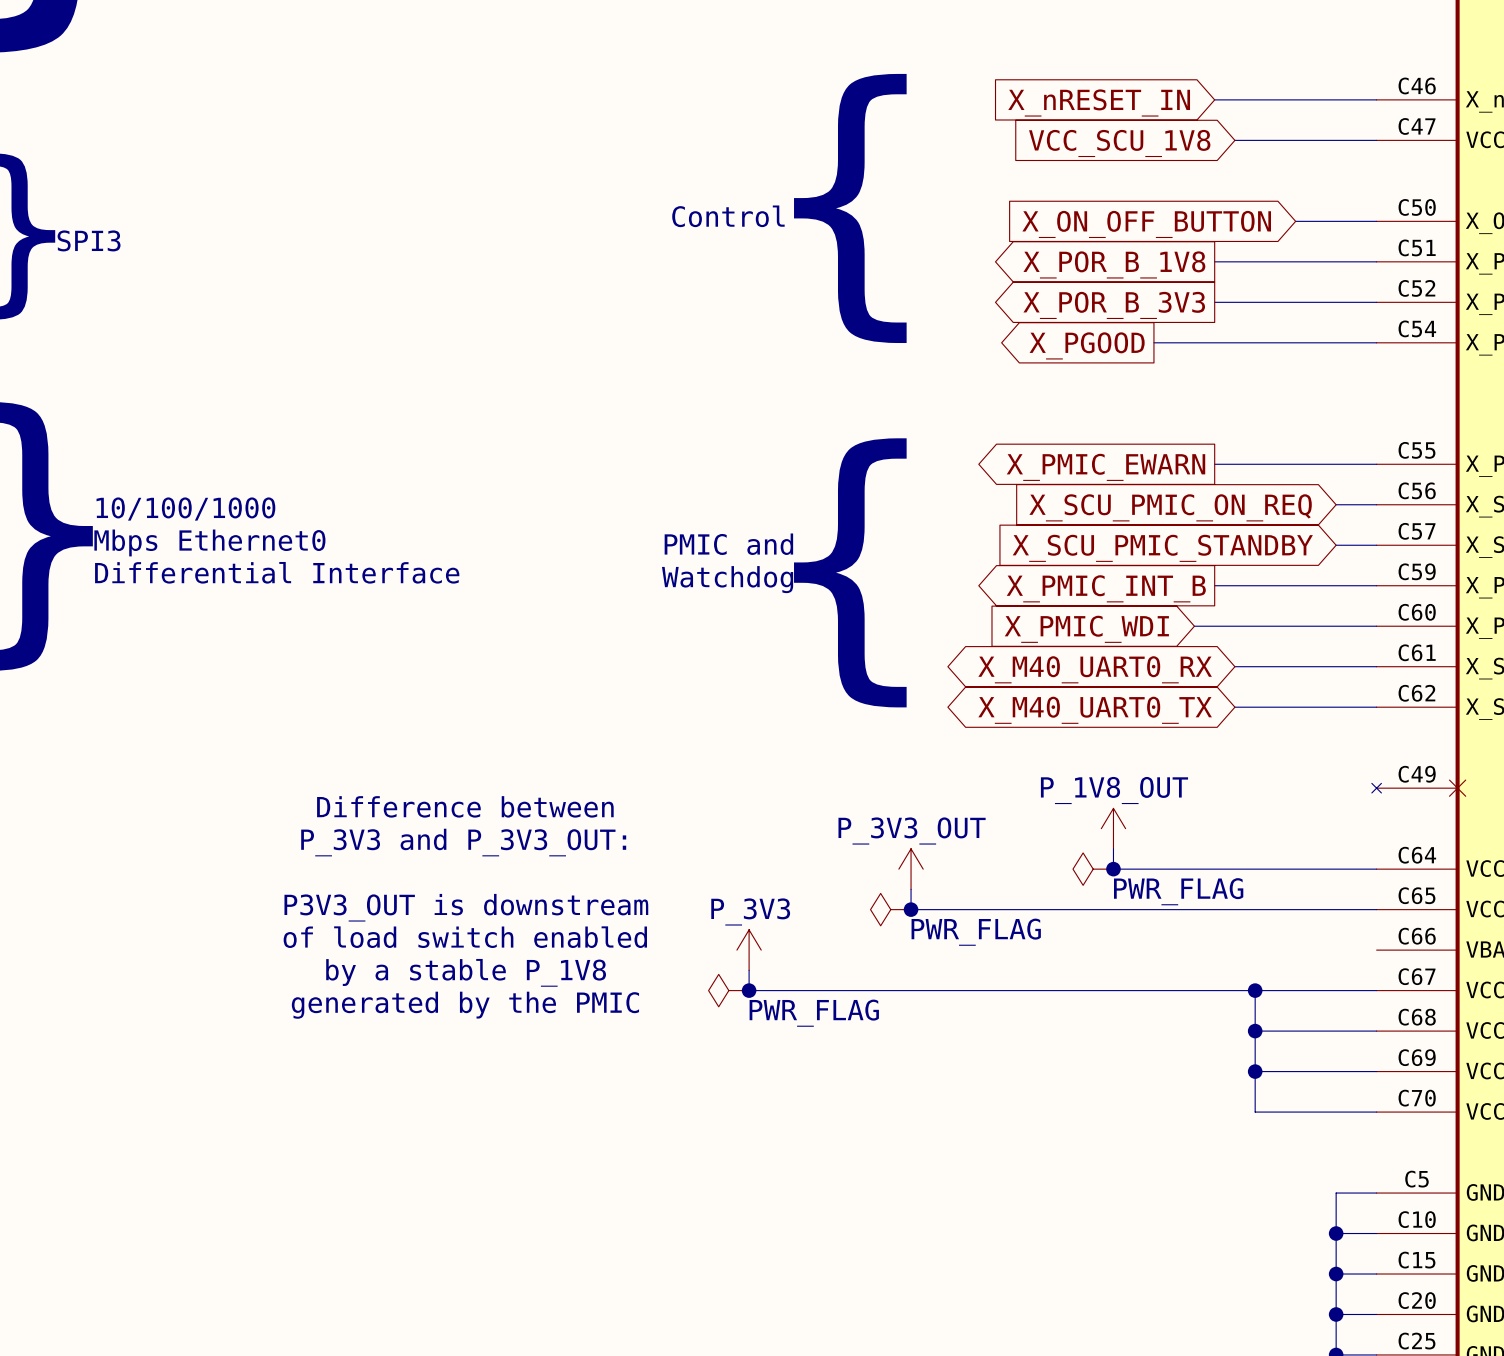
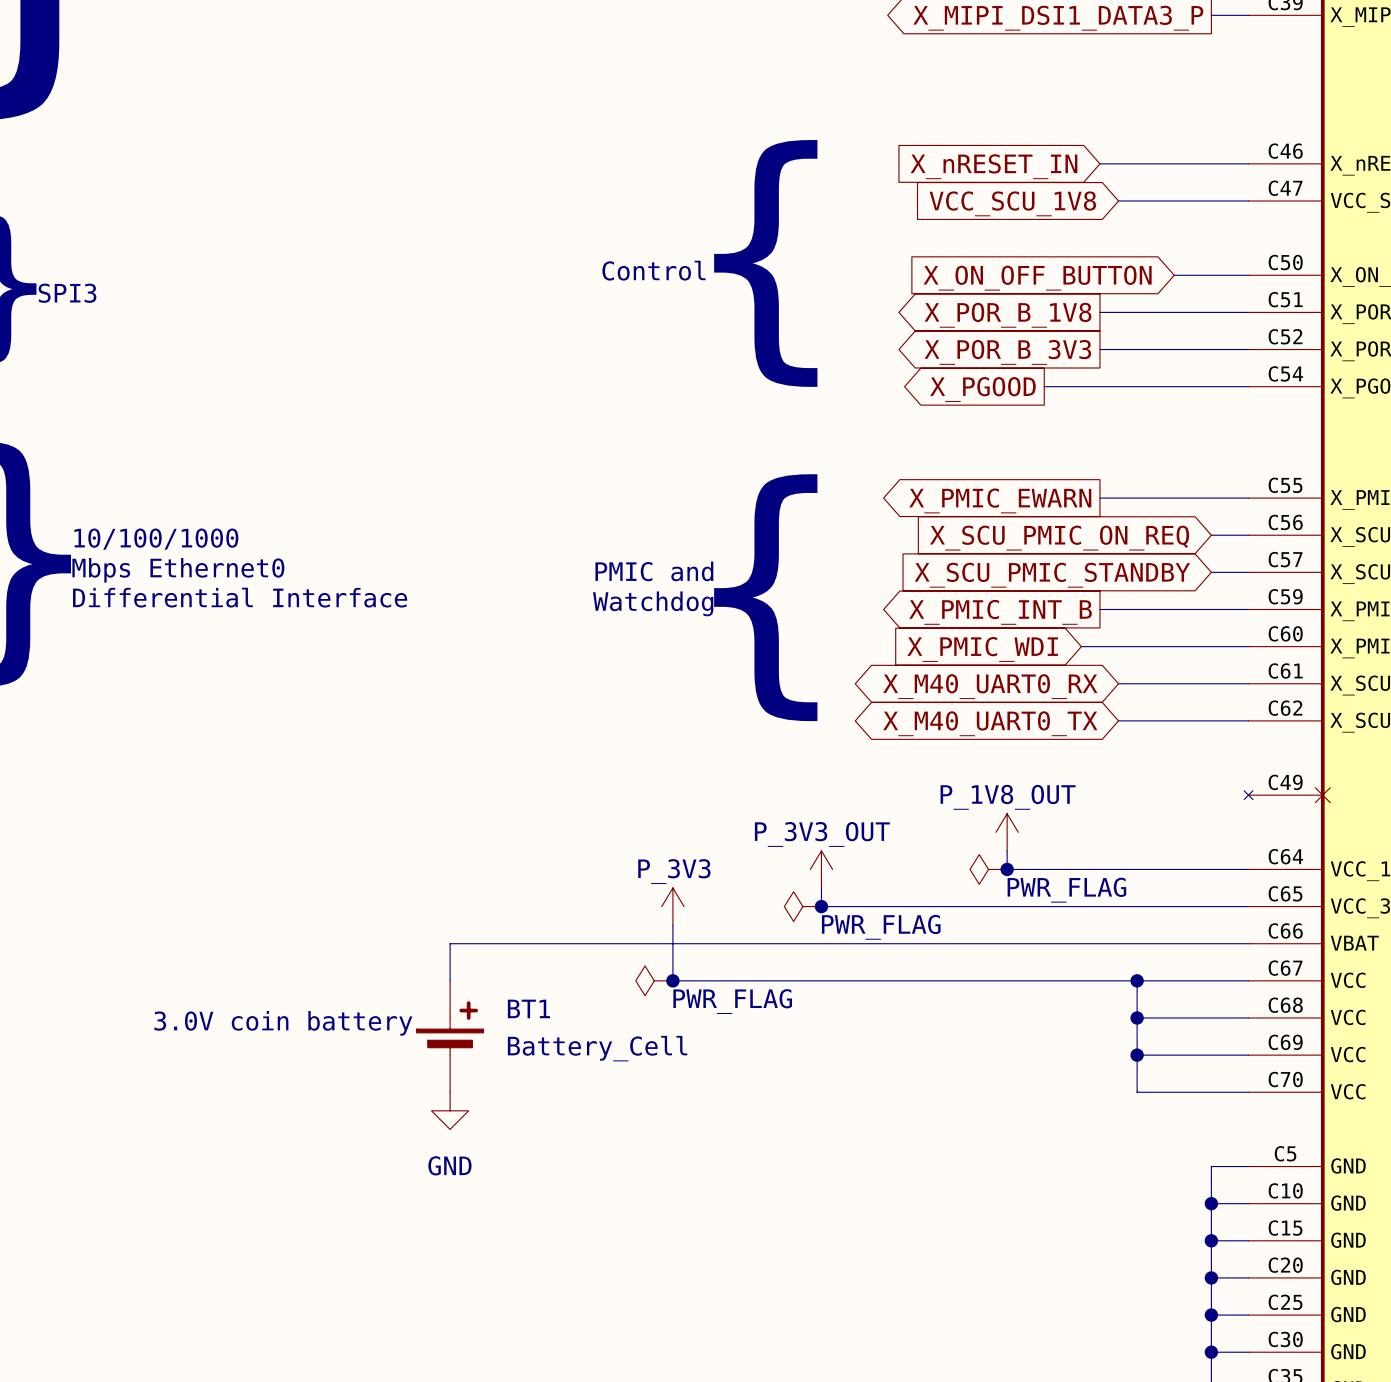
text: Difference between (465, 806) -> none
text: P_3V3 and P_3V3_OUT: (463, 842) -> none
text: P3V3_OUT is downstream (466, 907) -> none
text: of load switch enabled (465, 937) -> none
power symbol position: P_3V3 (749, 950) -> P_3V3 (672, 906)
wire: none -> (1248, 943) (450, 943) (450, 980)
text: by a stable P_1V8 (466, 972) -> none
text: generated by the PMIC (465, 1005) -> none
text: none -> 3.0V coin battery (283, 1023)
BT1: none -> Battery_Cell (450, 1036)
power symbol: none -> GND (450, 1110)

